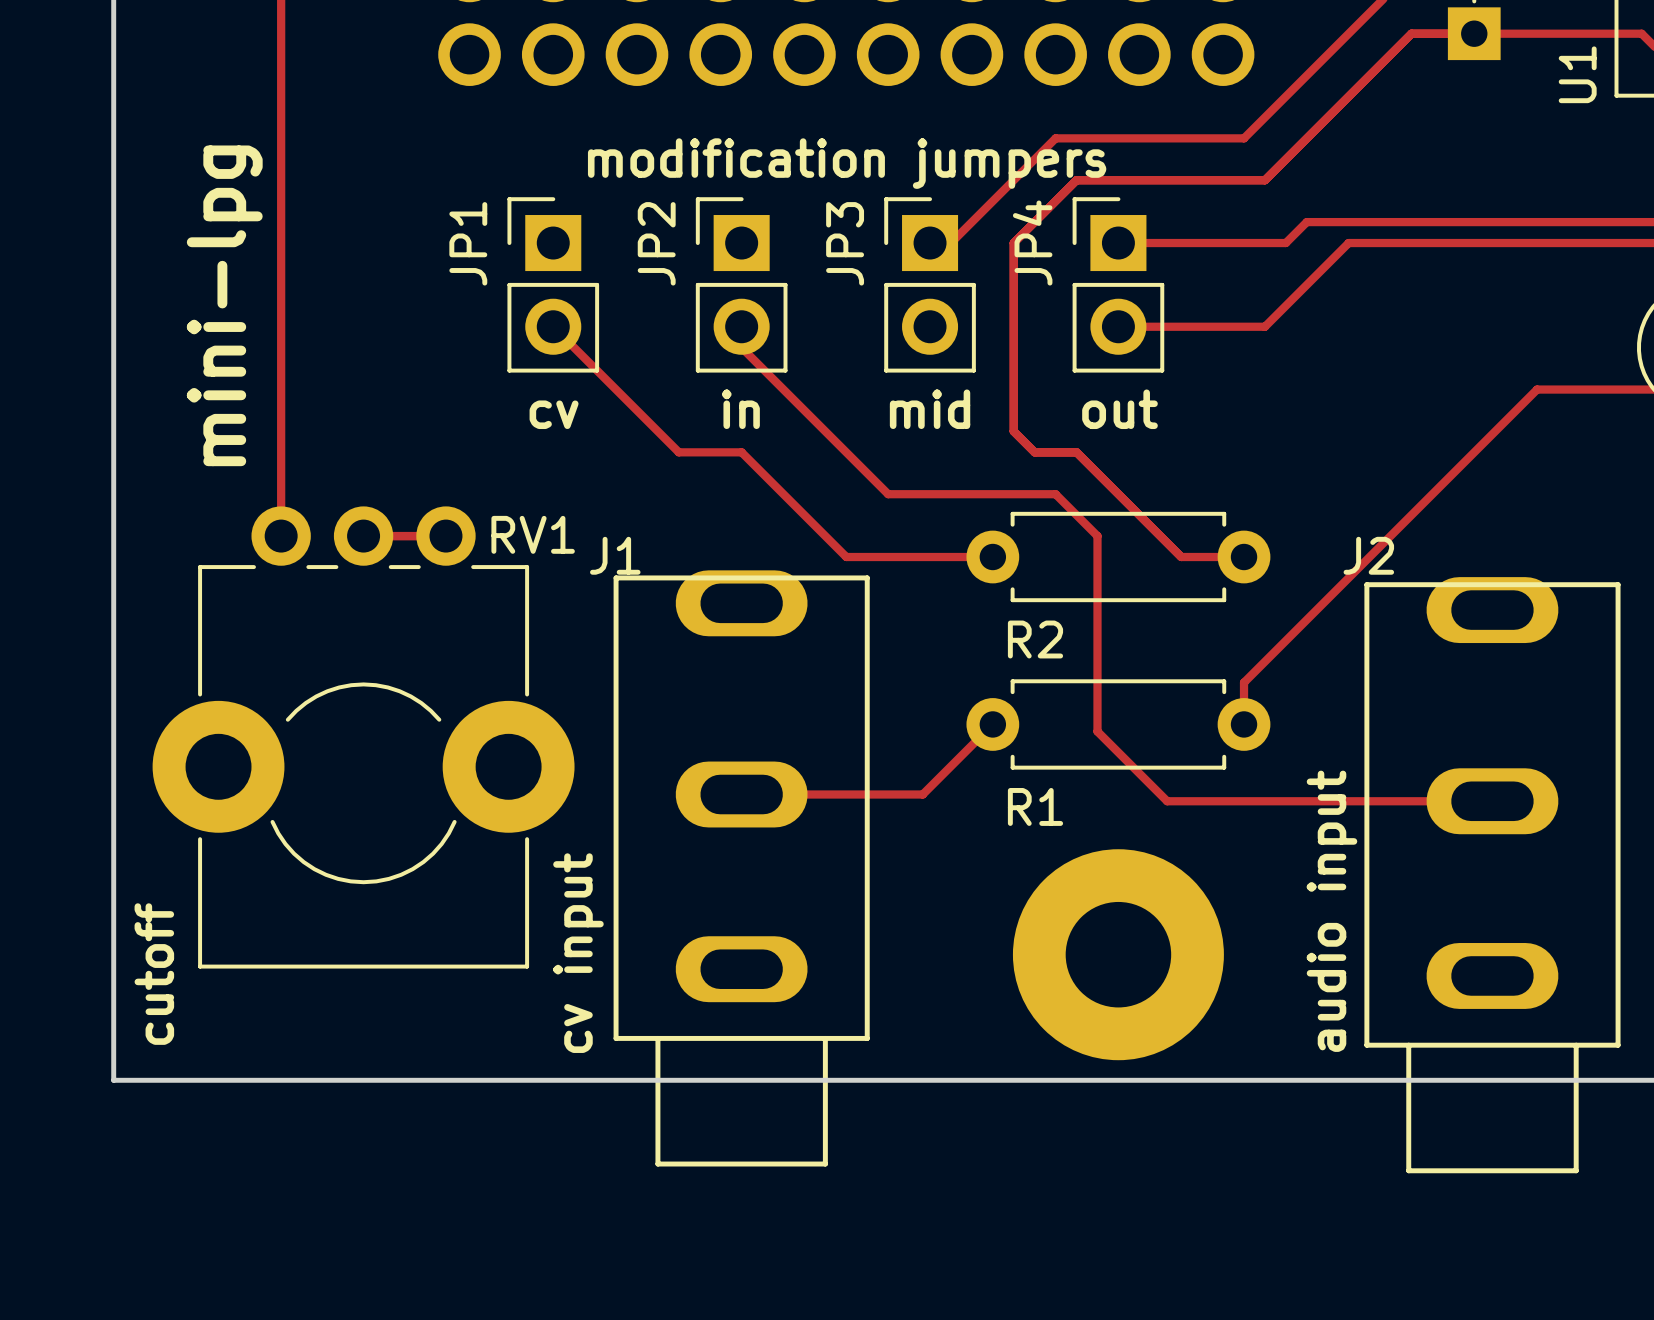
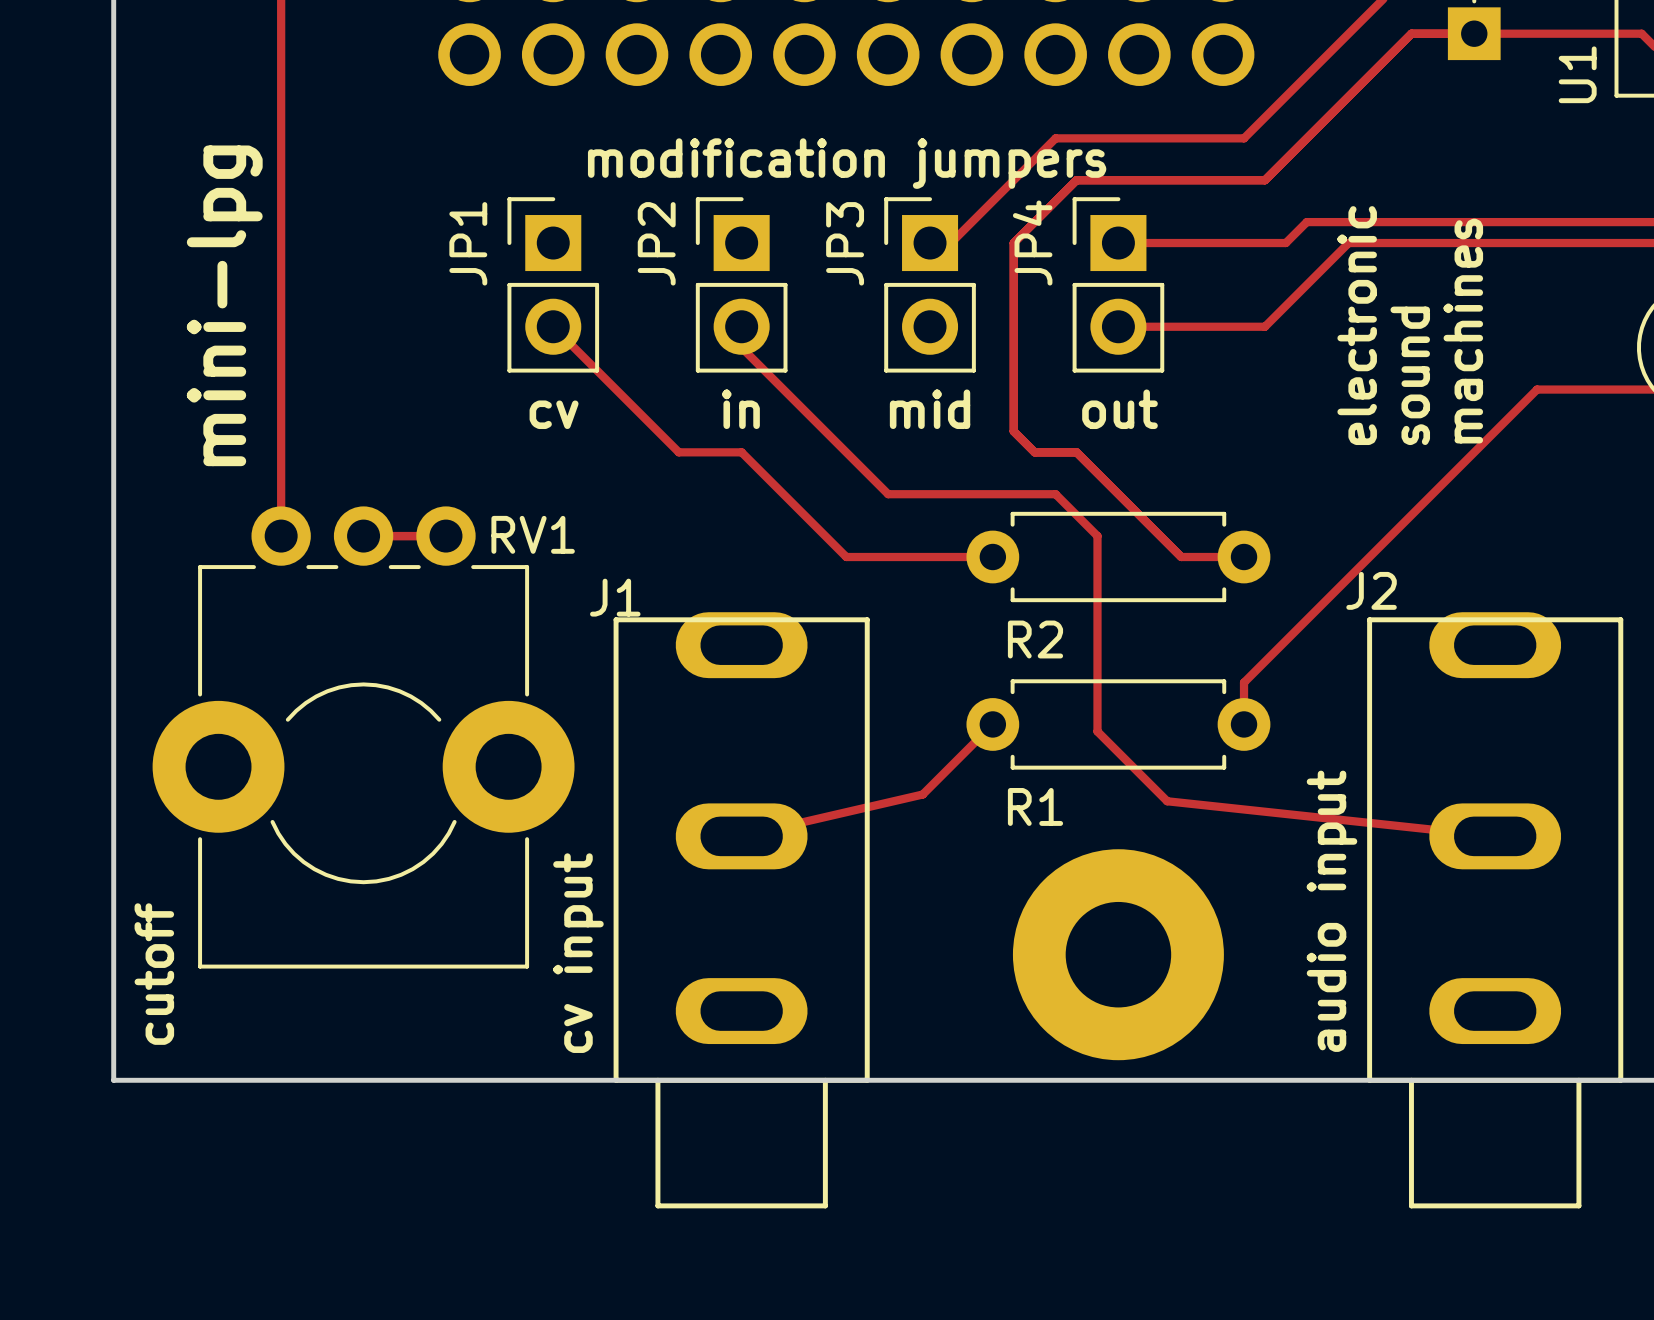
text: none -> electronic (1357, 325)
text: none -> machines (1463, 331)
text: none -> sound (1410, 375)
track: (741, 794) (922, 794) -> (741, 836) (922, 794)
track: (1167, 801) (1492, 801) -> (1167, 801) (1495, 836)
J1 position: (741, 868) -> (741, 910)
J2 position: (1492, 875) -> (1495, 910)

